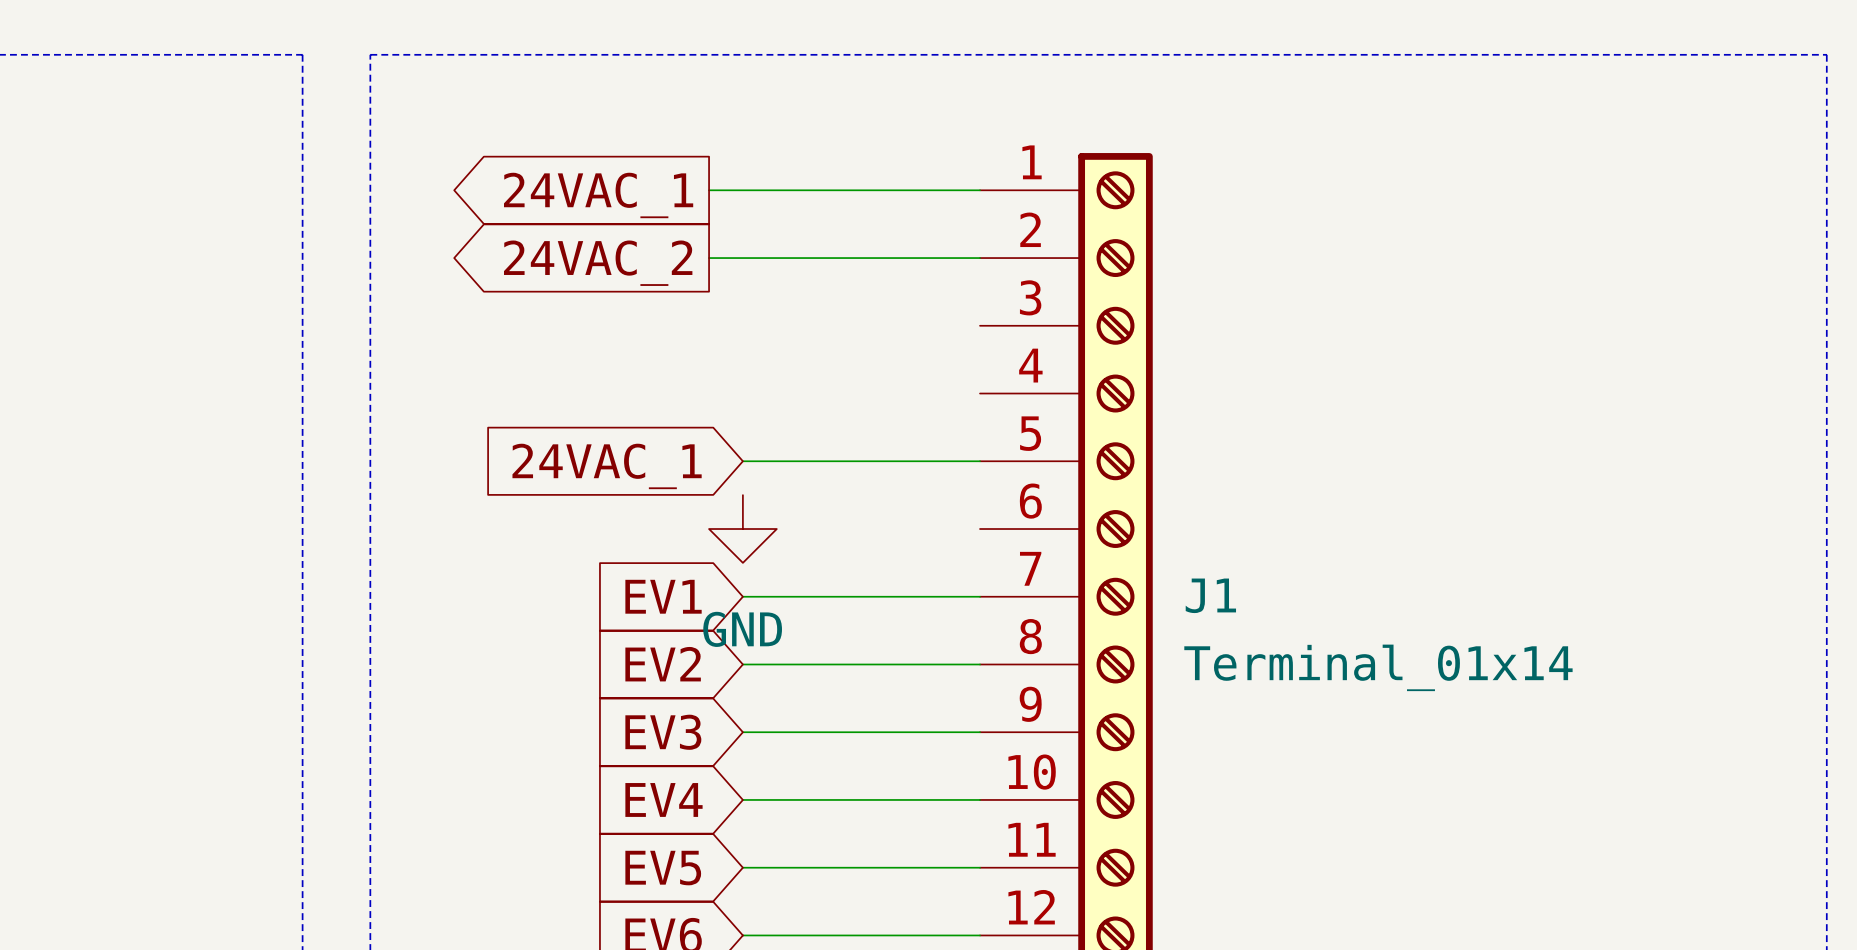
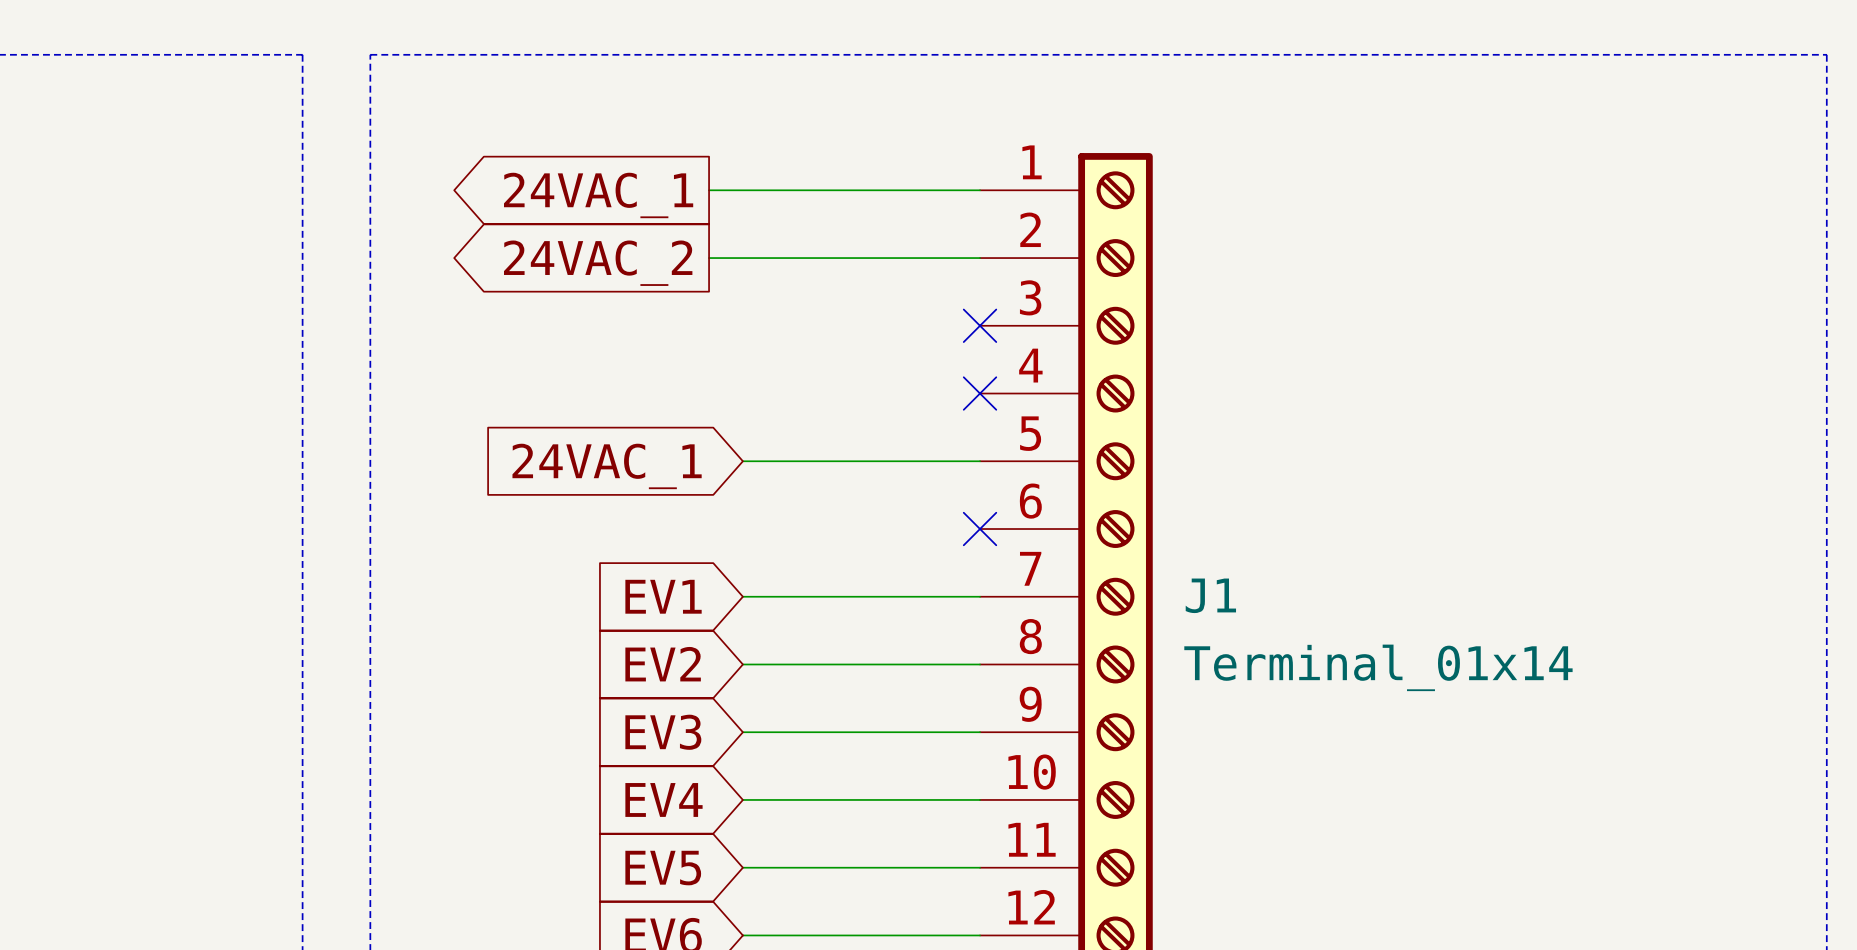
no-connect mark: none -> (980, 325)
no-connect mark: none -> (980, 393)
power symbol: GND (742, 529) -> none
no-connect mark: none -> (980, 529)

